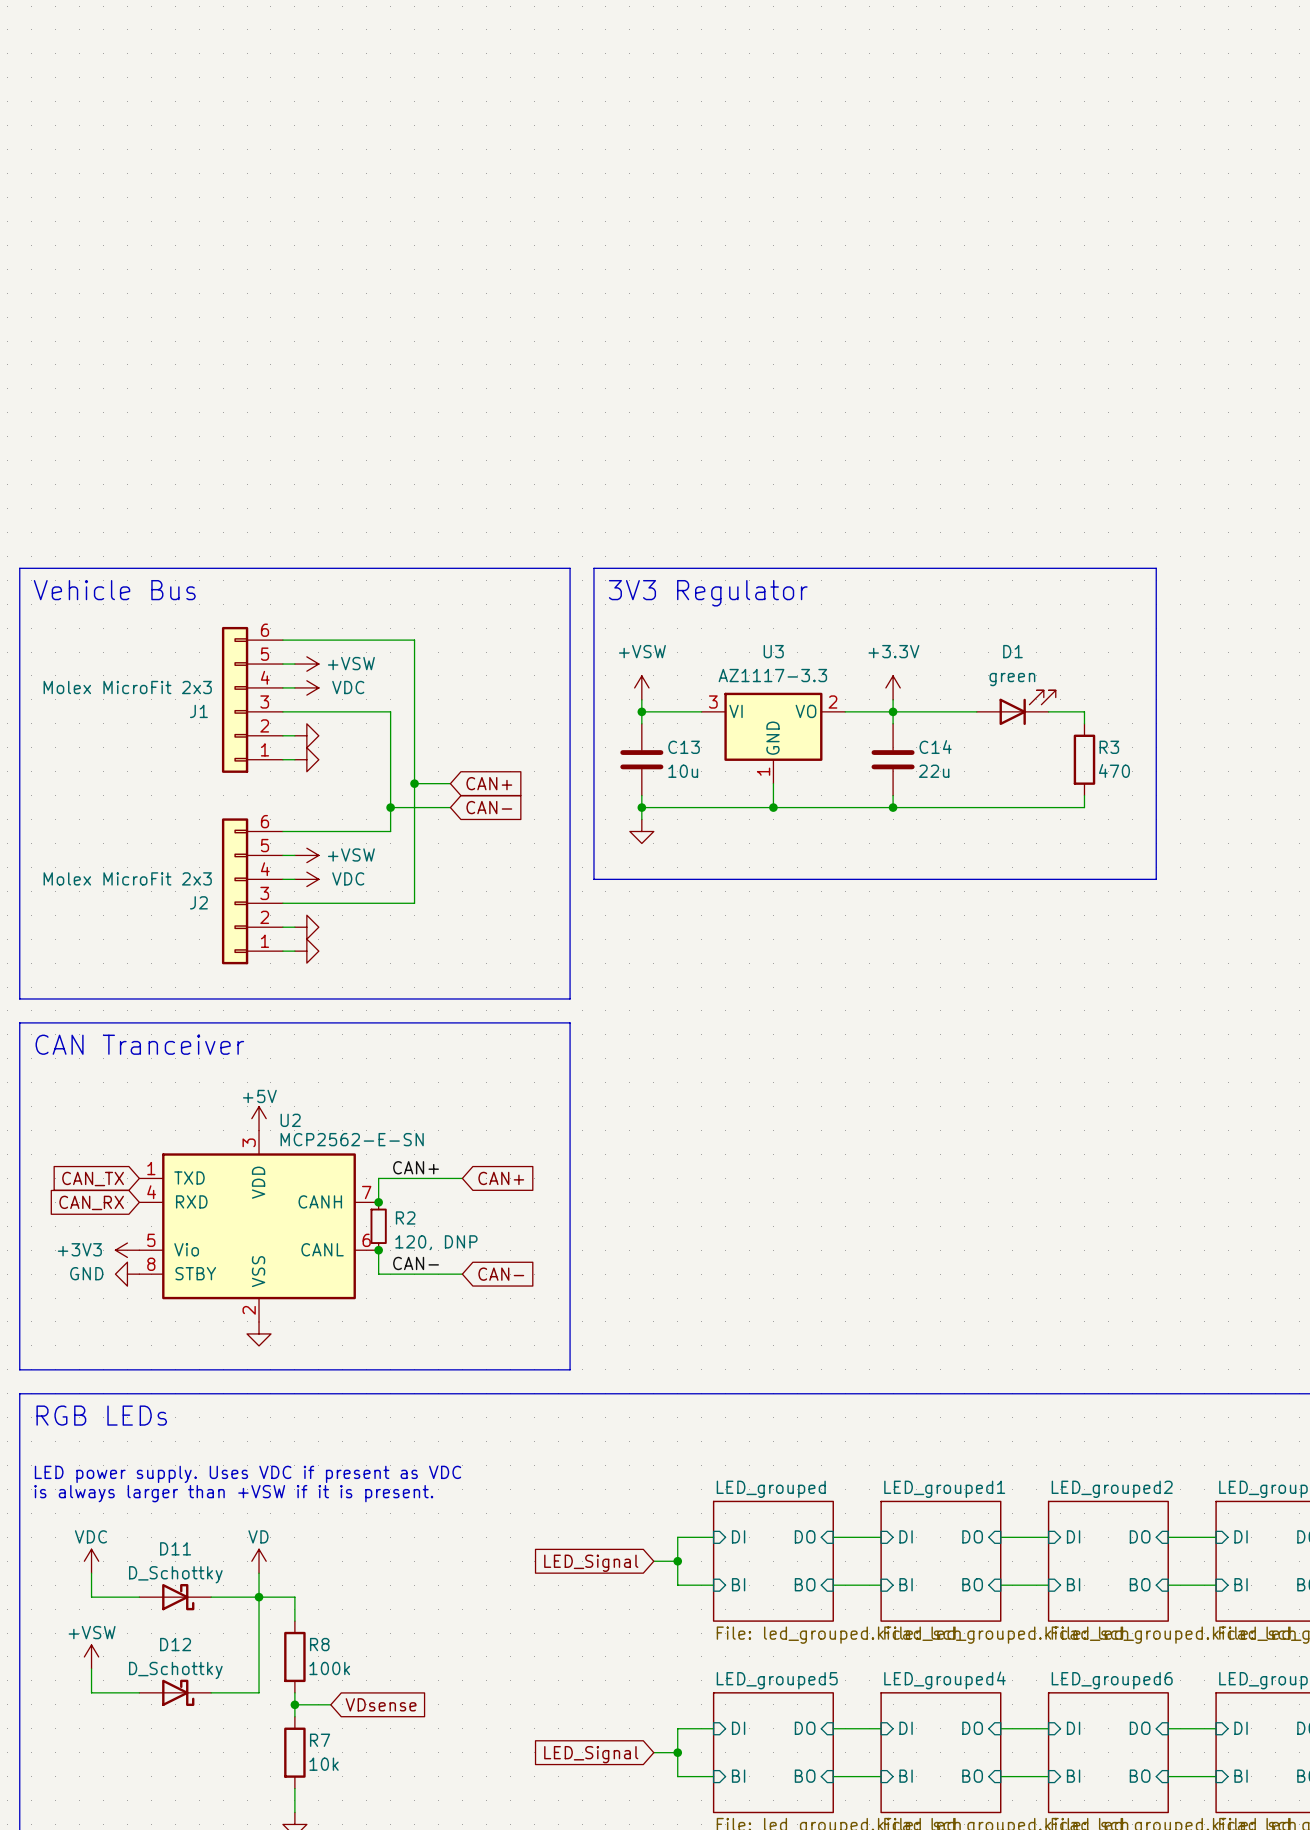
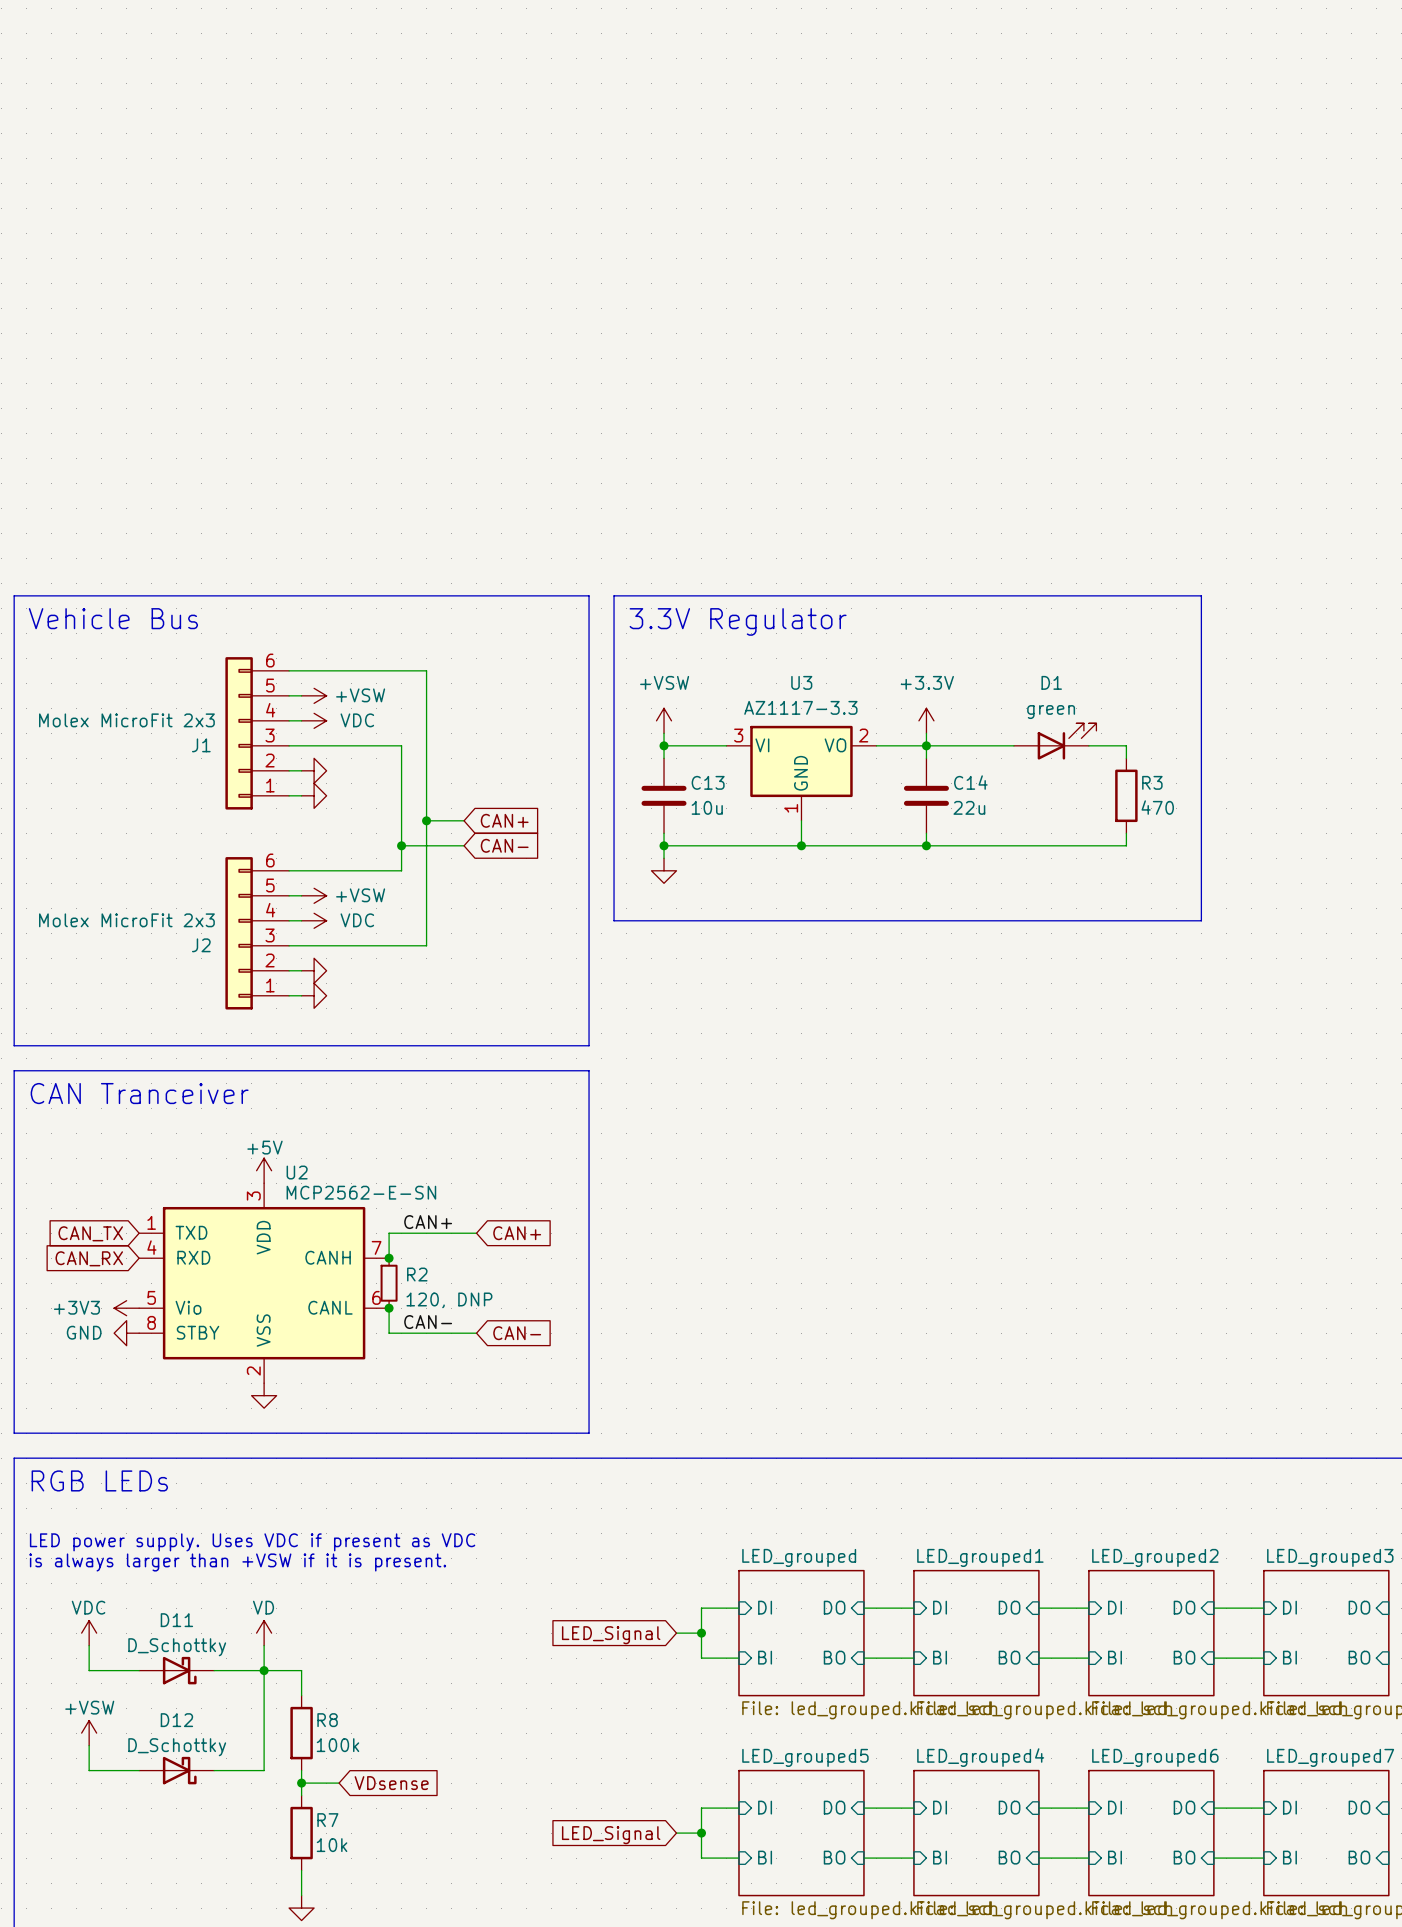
text: 3V3 Regulator (708, 593) -> 3.3V Regulator (738, 621)

